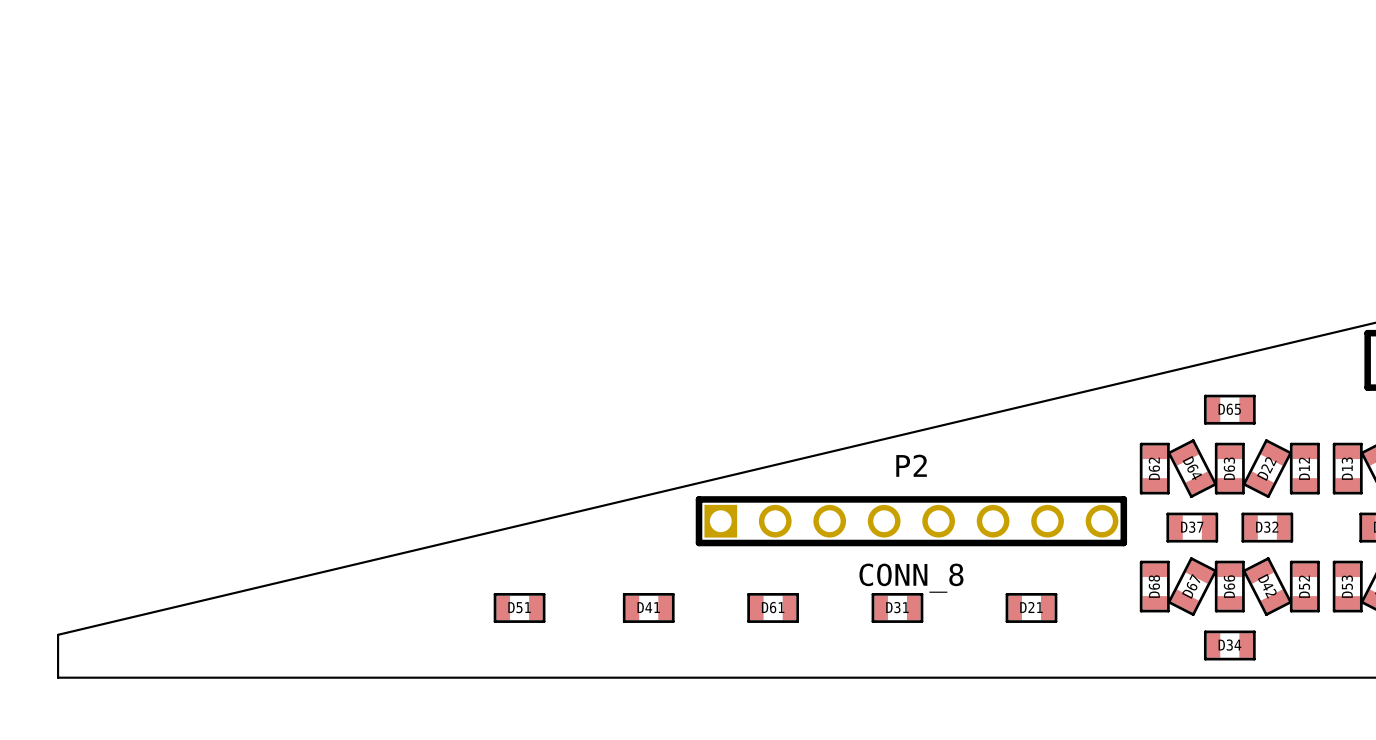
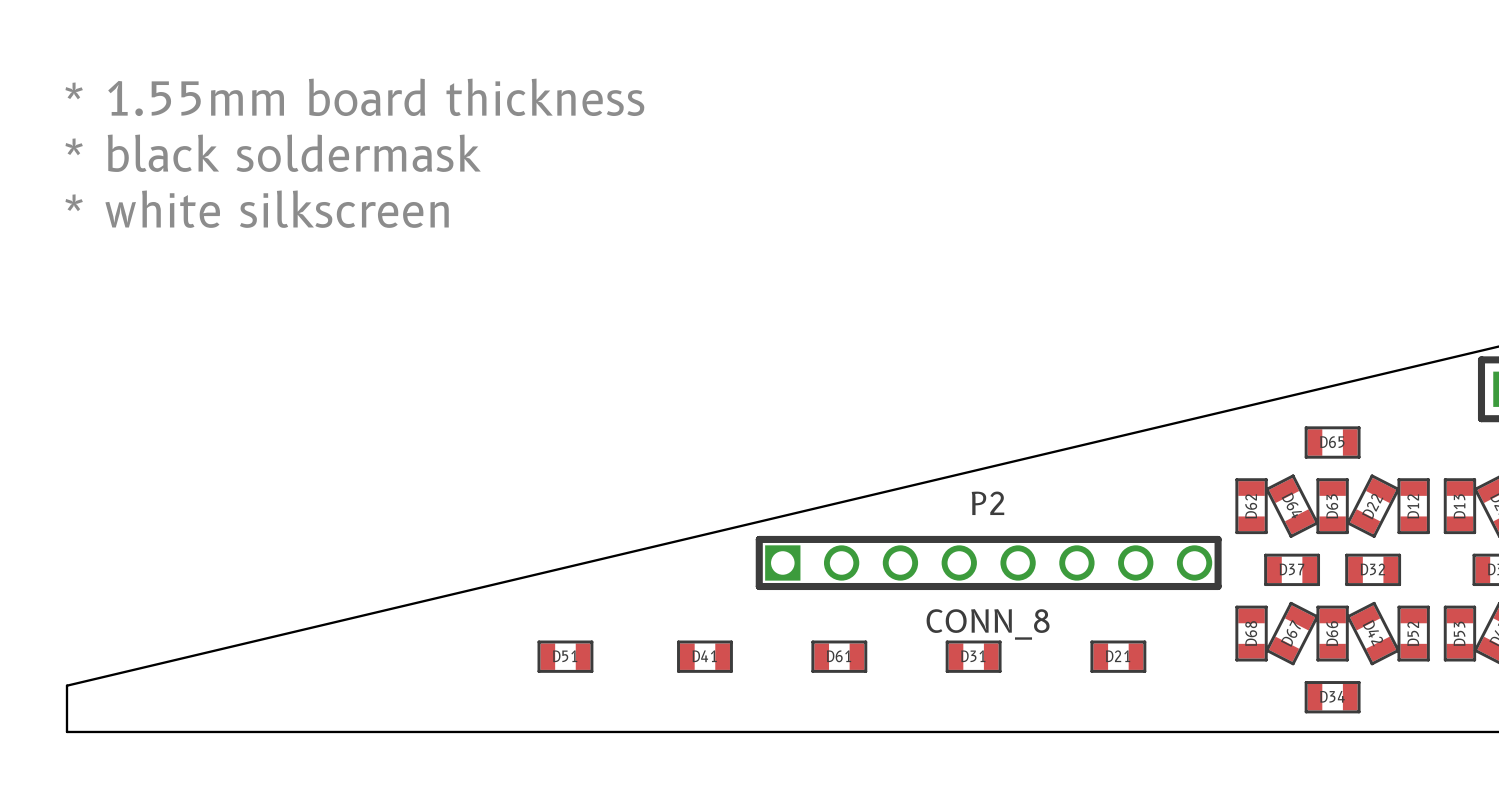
text: none -> * 1.55mm board thickness (354, 97)
text: none -> * black soldermask (273, 153)
text: none -> * white silkscreen (257, 209)

